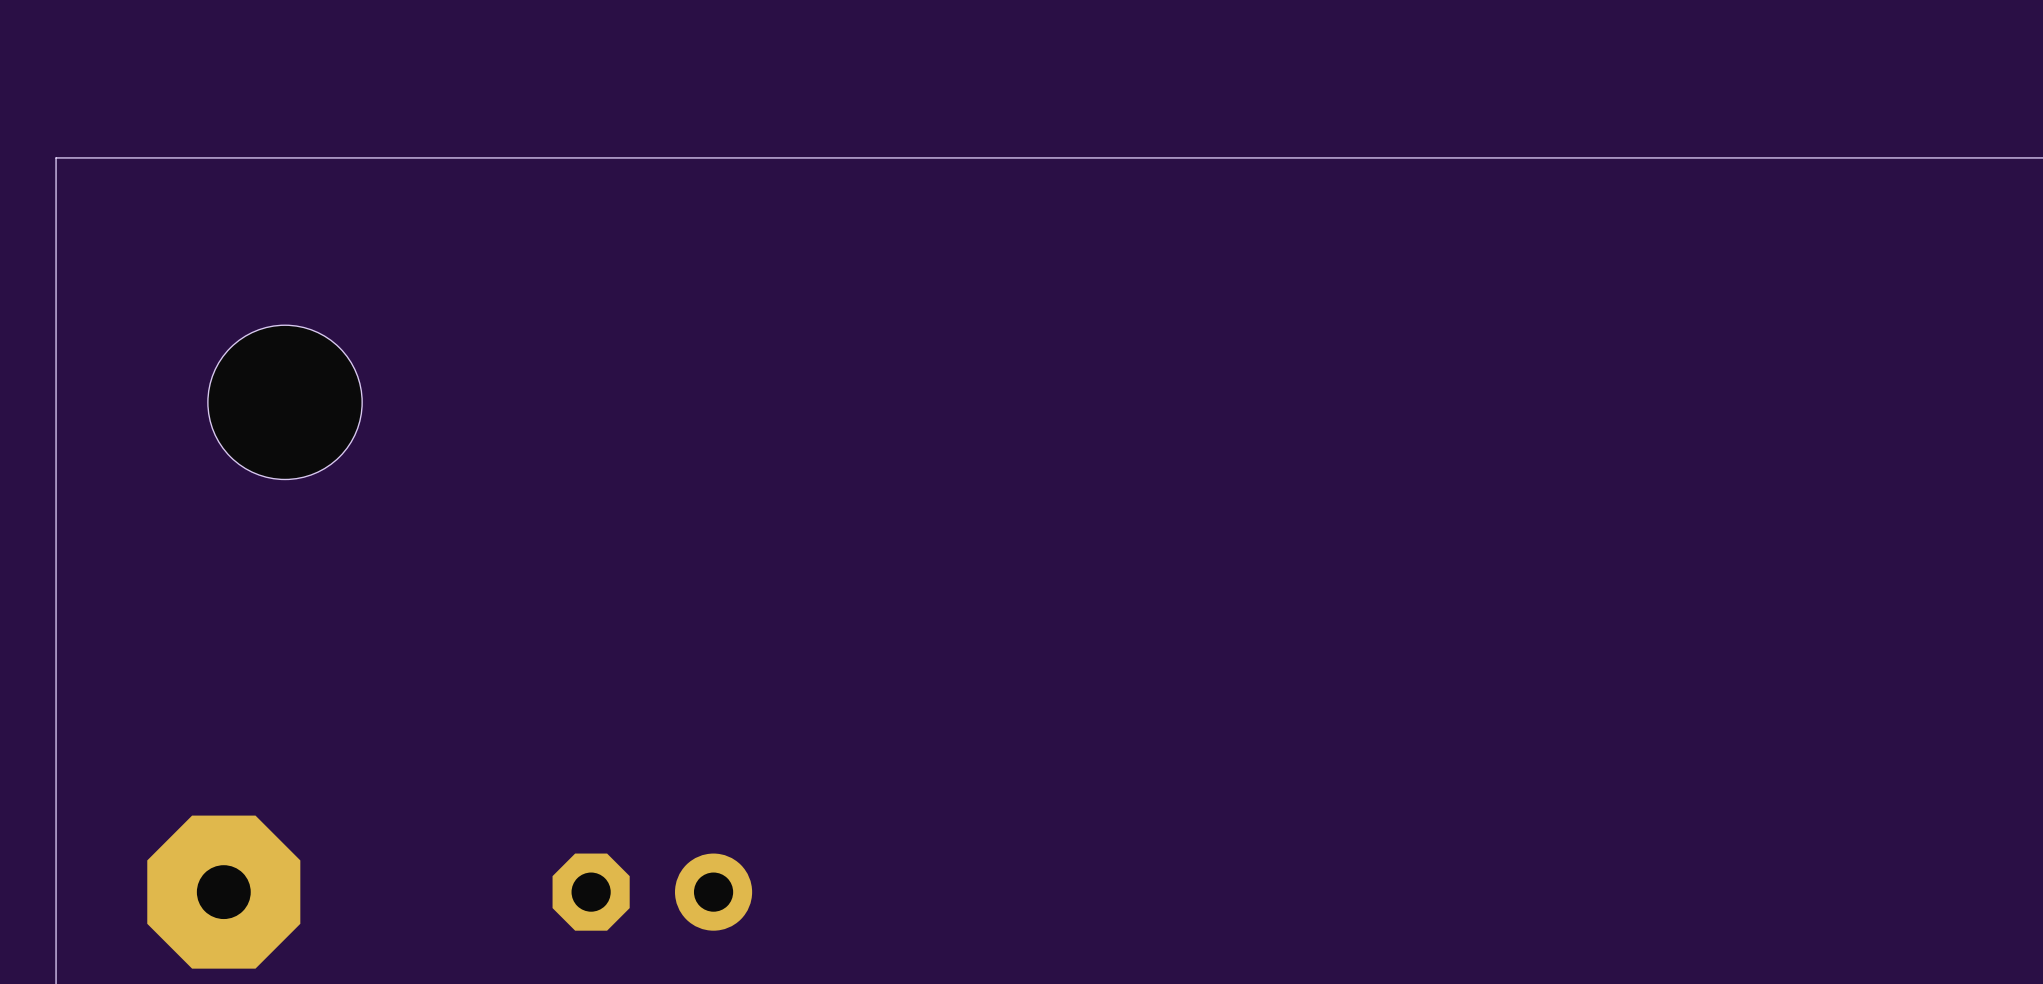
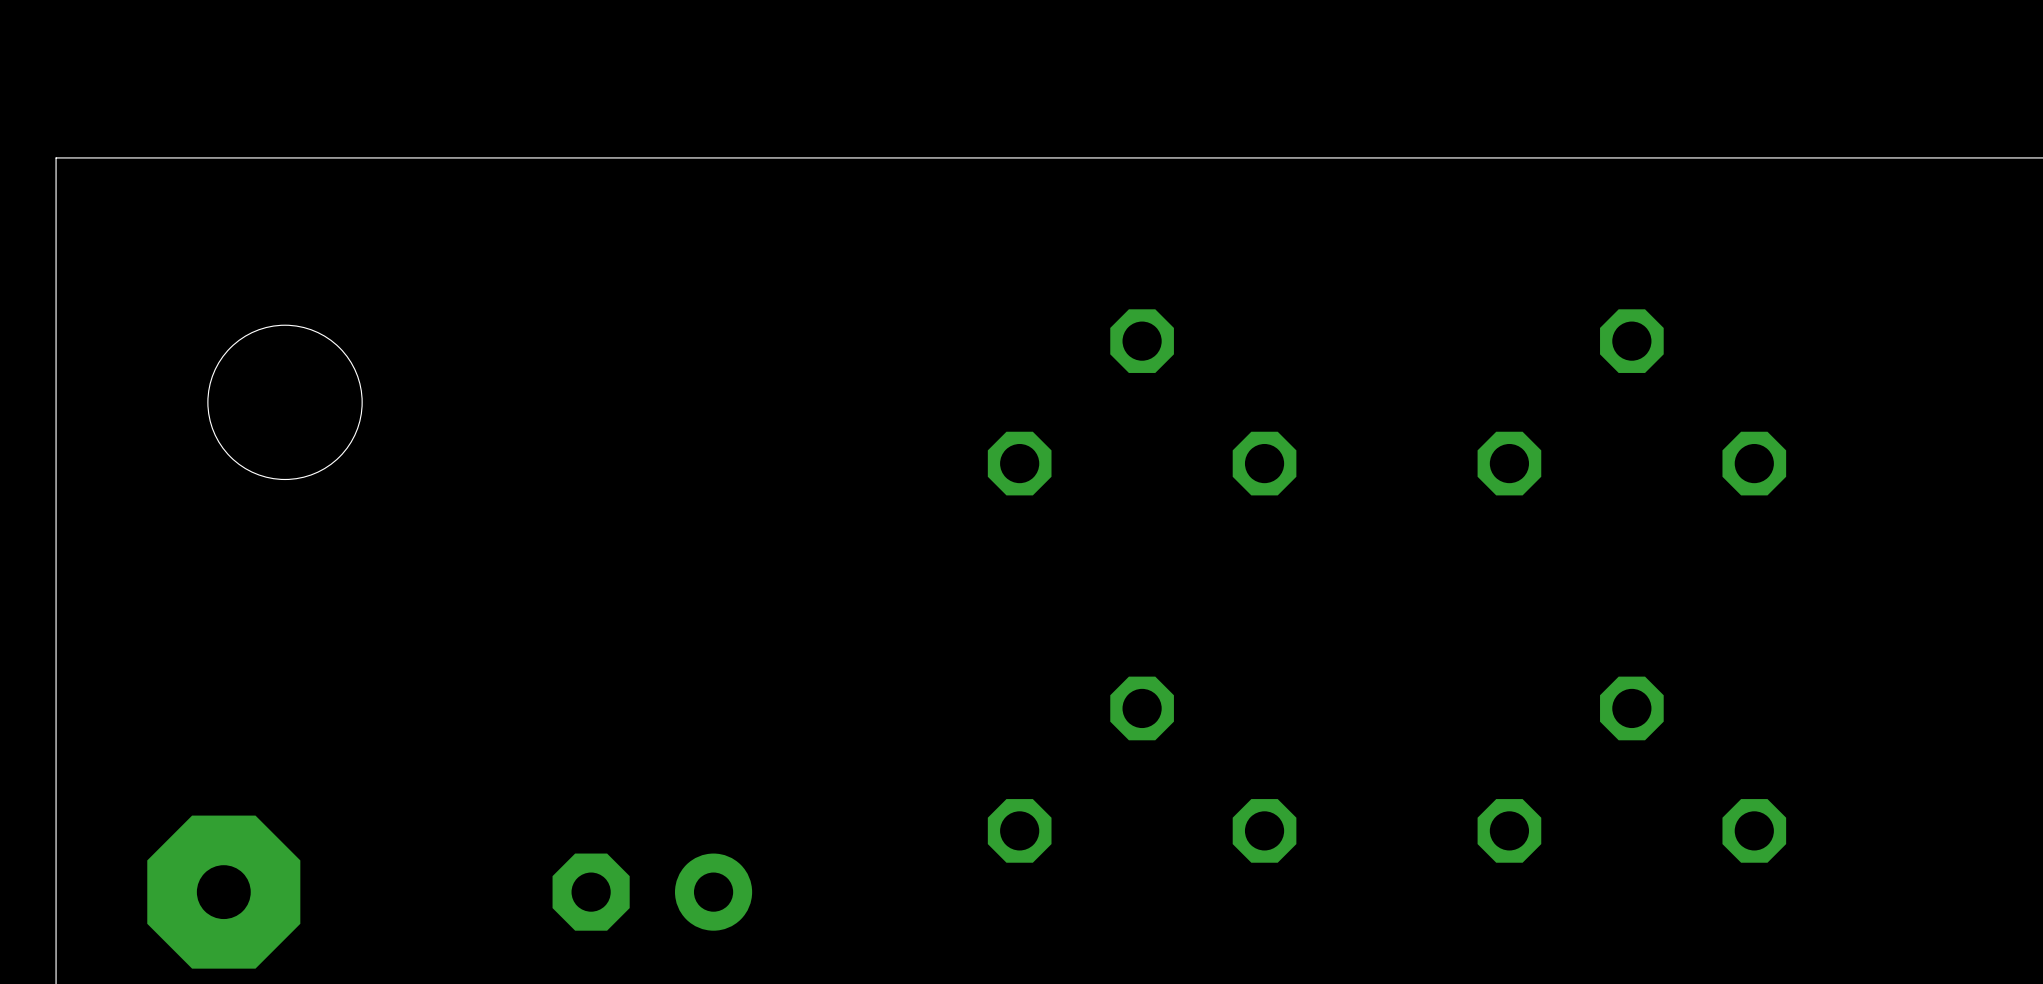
part: none -> (1142, 402)
part: none -> (1631, 402)
part: none -> (1142, 769)
part: none -> (1631, 769)

